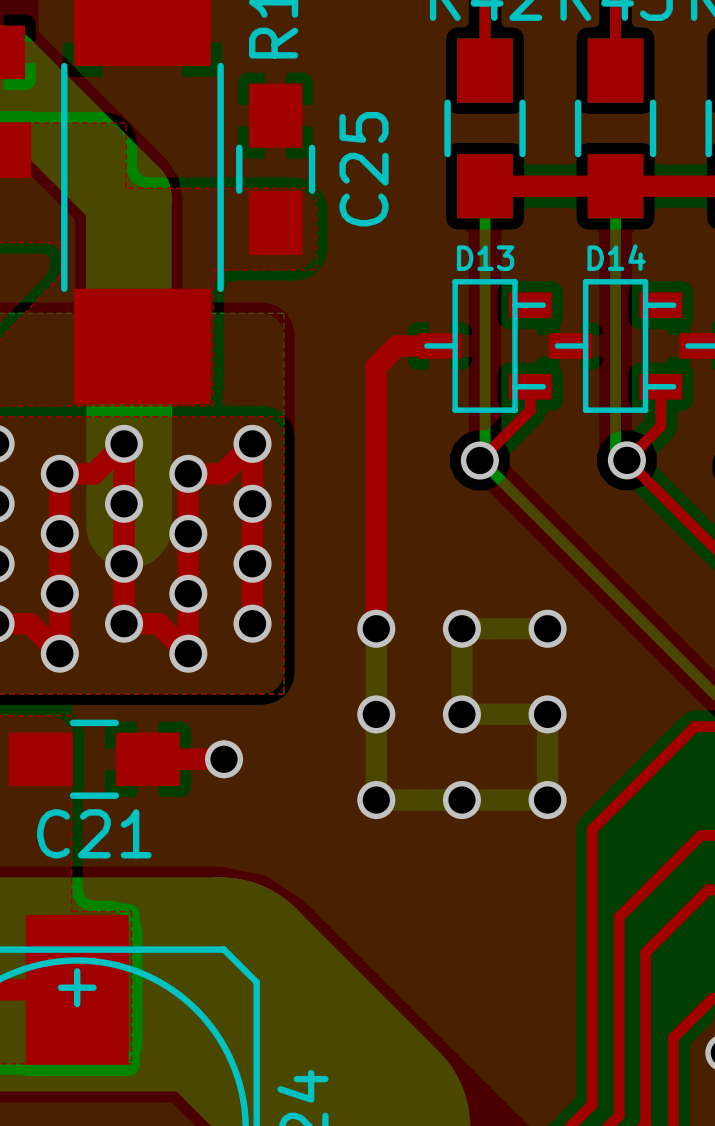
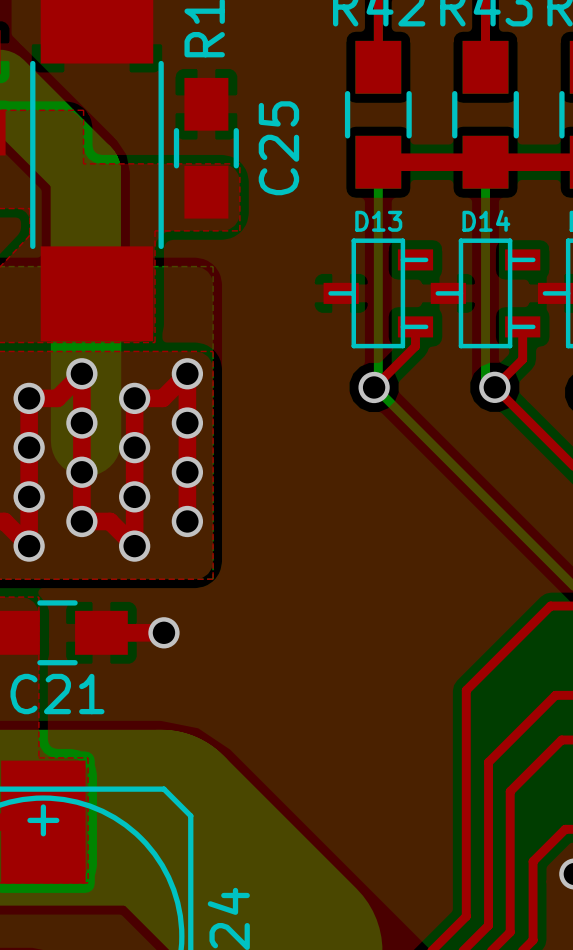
top track: (439, 345) (396, 345) (376, 366) (376, 628) -> none
via: (376, 628) -> none
via: (461, 628) -> none
via: (547, 628) -> none
via: (376, 714) -> none
via: (461, 714) -> none
via: (547, 714) -> none
via: (376, 800) -> none
via: (461, 800) -> none
via: (547, 800) -> none

